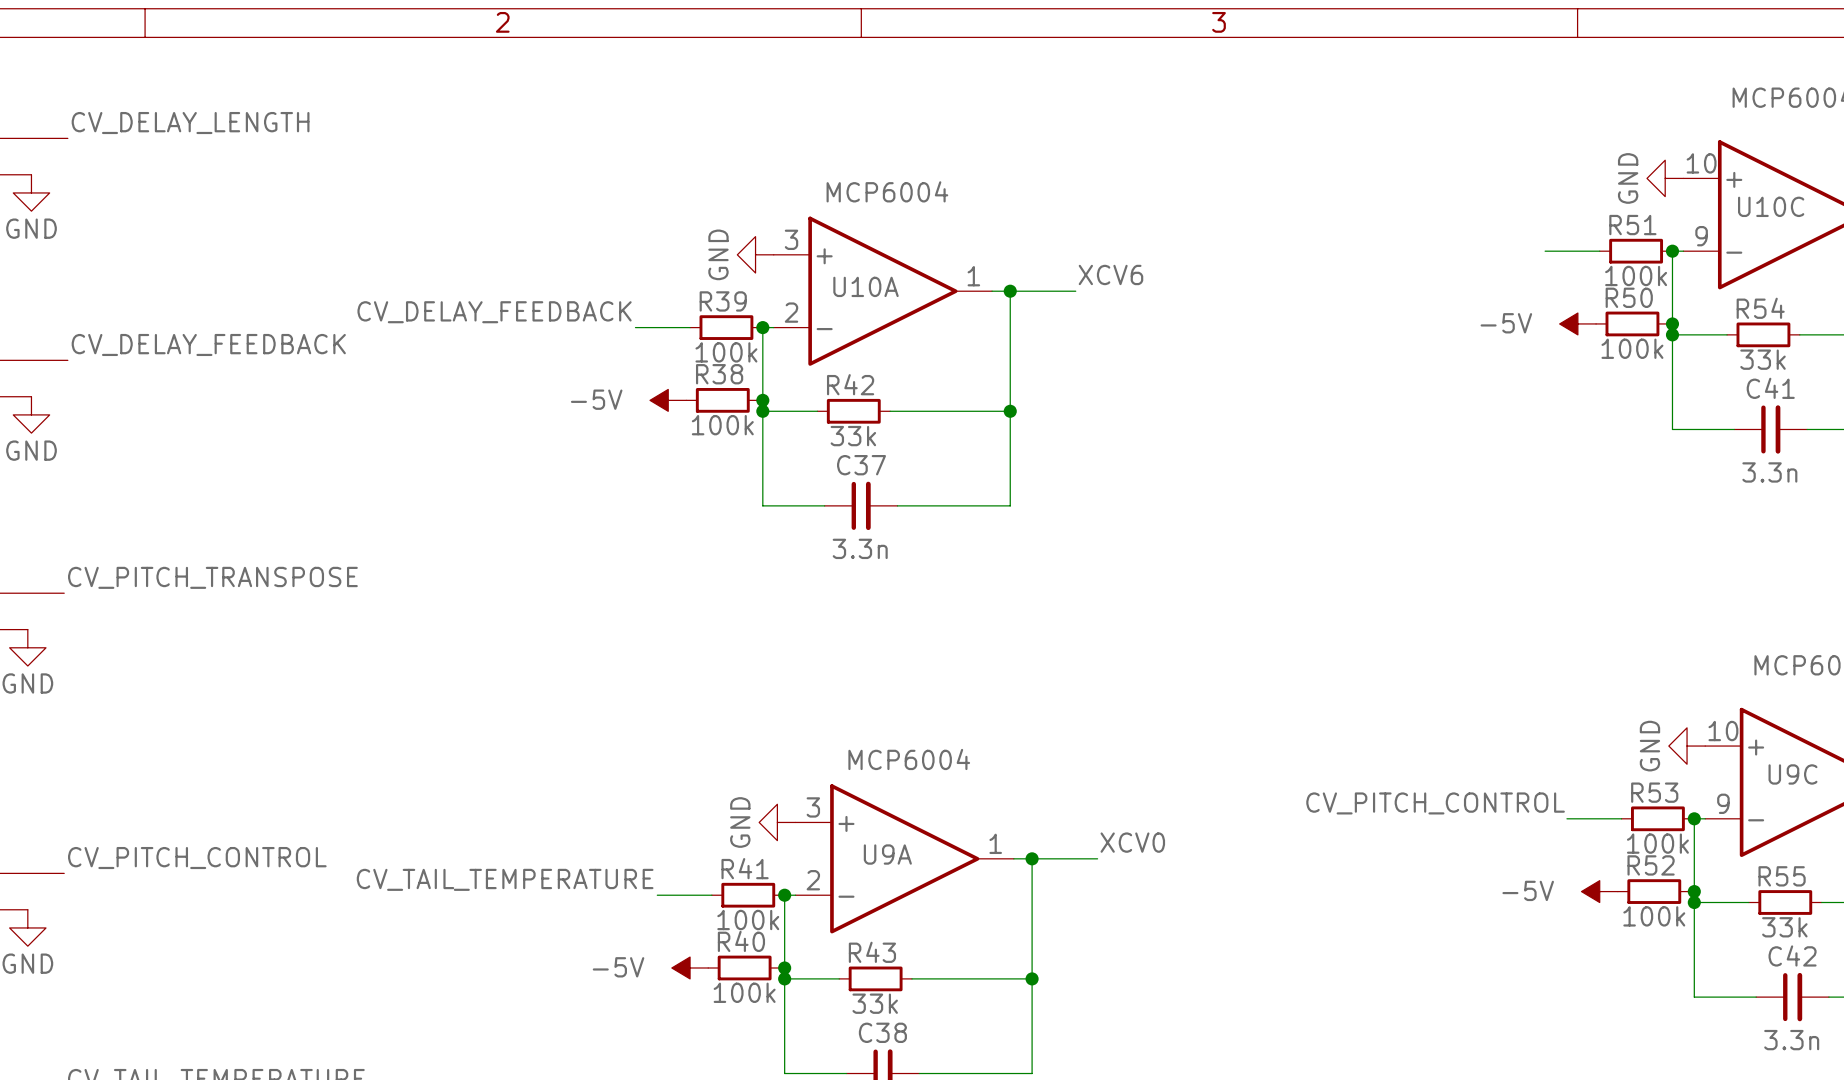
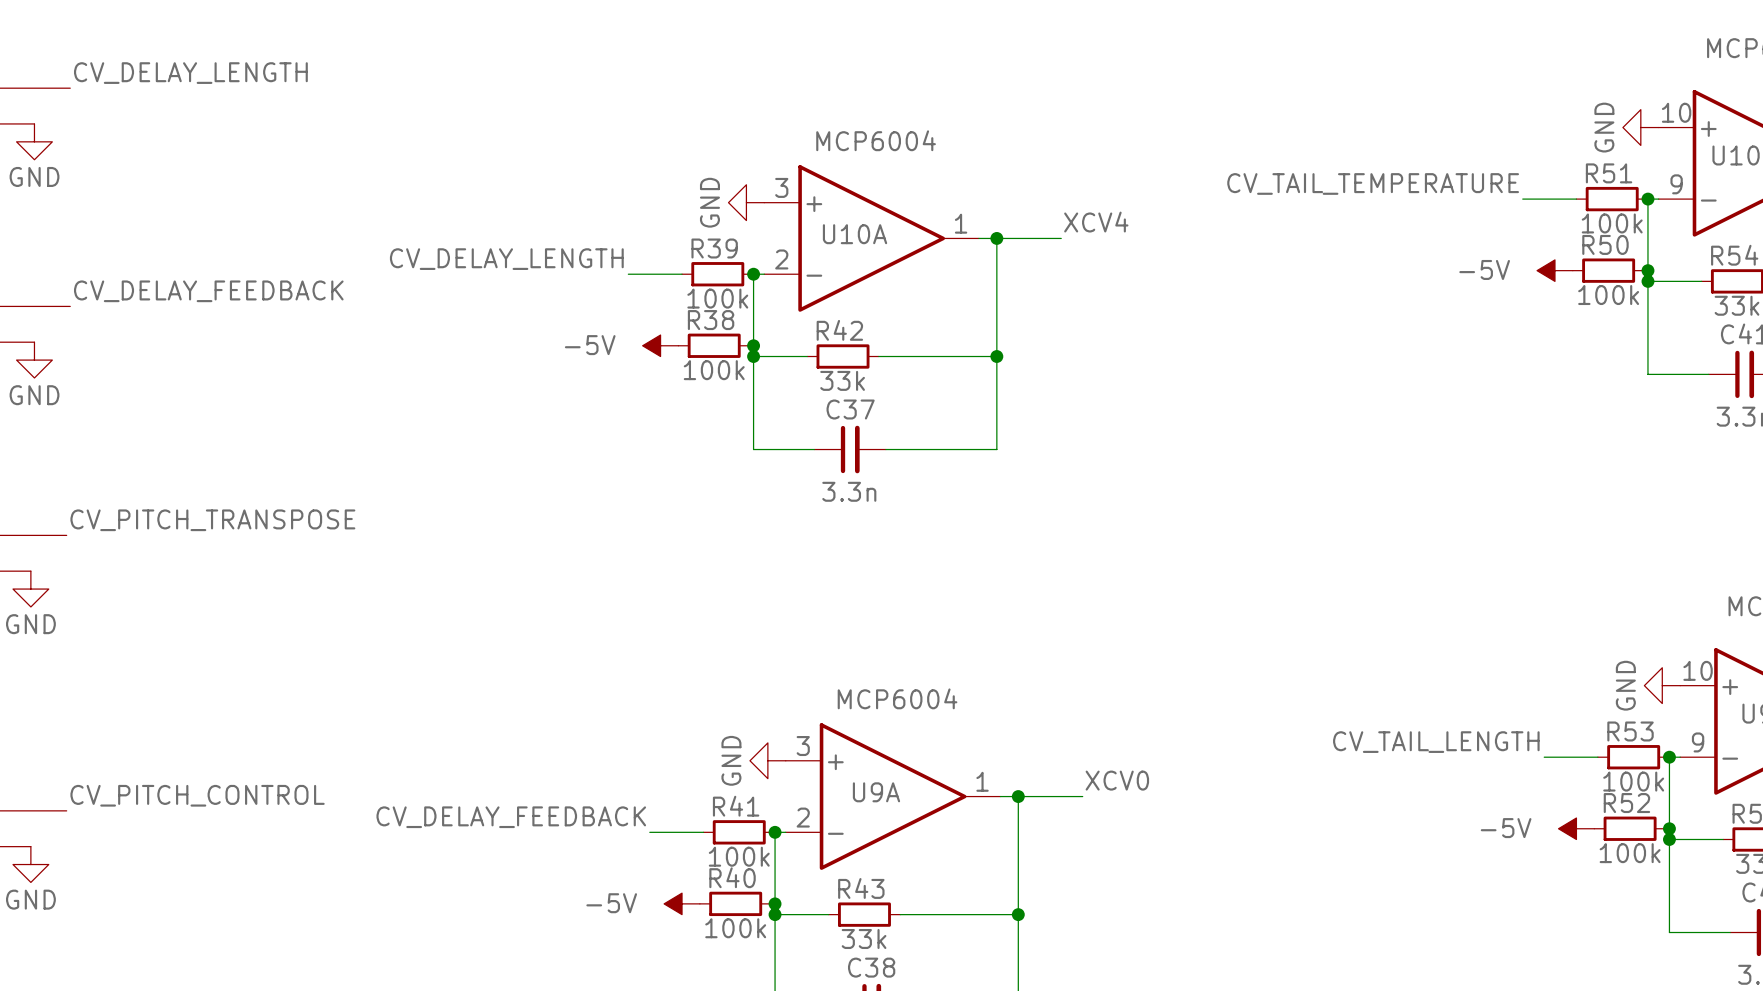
label: none -> CV_TAIL_TEMPERATURE (1373, 183)
label: XCV6 (1110, 274) -> XCV4 (1096, 222)
label: CV_DELAY_FEEDBACK (494, 312) -> CV_DELAY_LENGTH (506, 259)
label: CV_PITCH_CONTROL (1435, 803) -> CV_TAIL_LENGTH (1436, 742)
label: CV_TAIL_TEMPERATURE (505, 879) -> CV_DELAY_FEEDBACK (511, 817)

